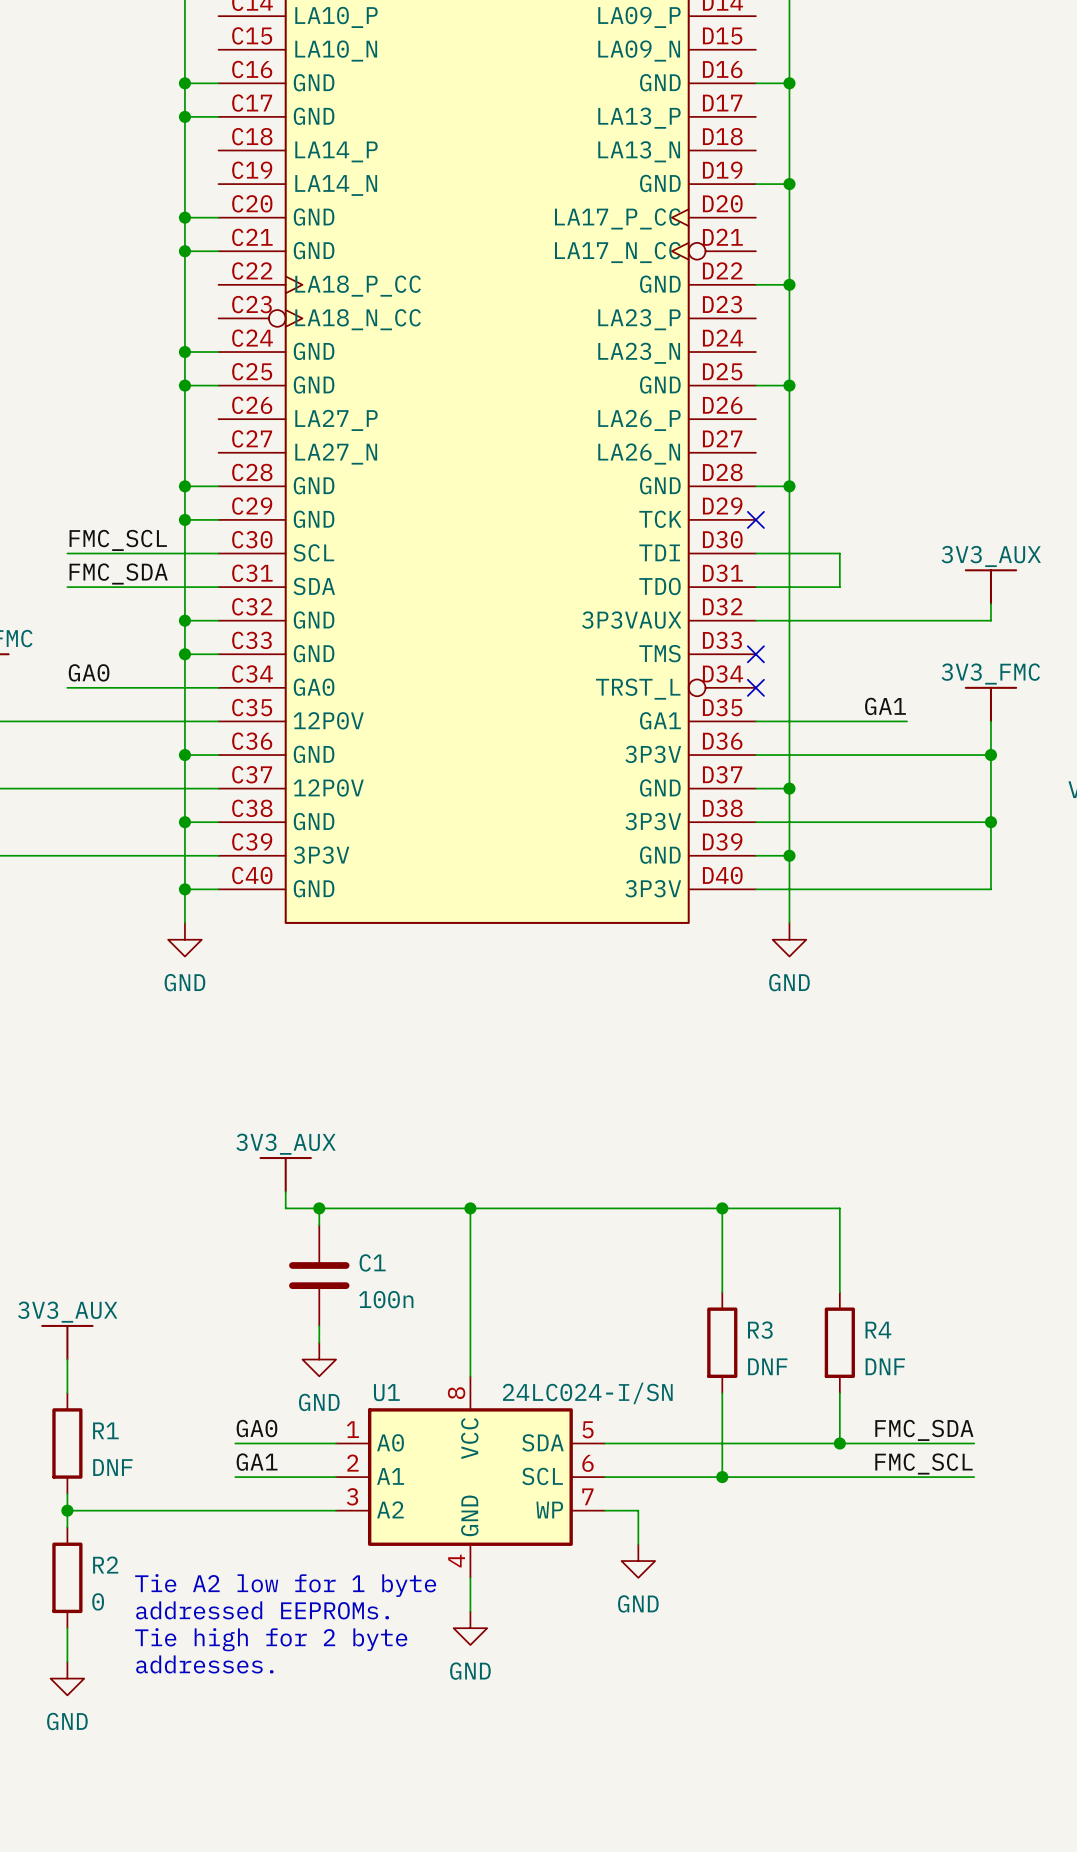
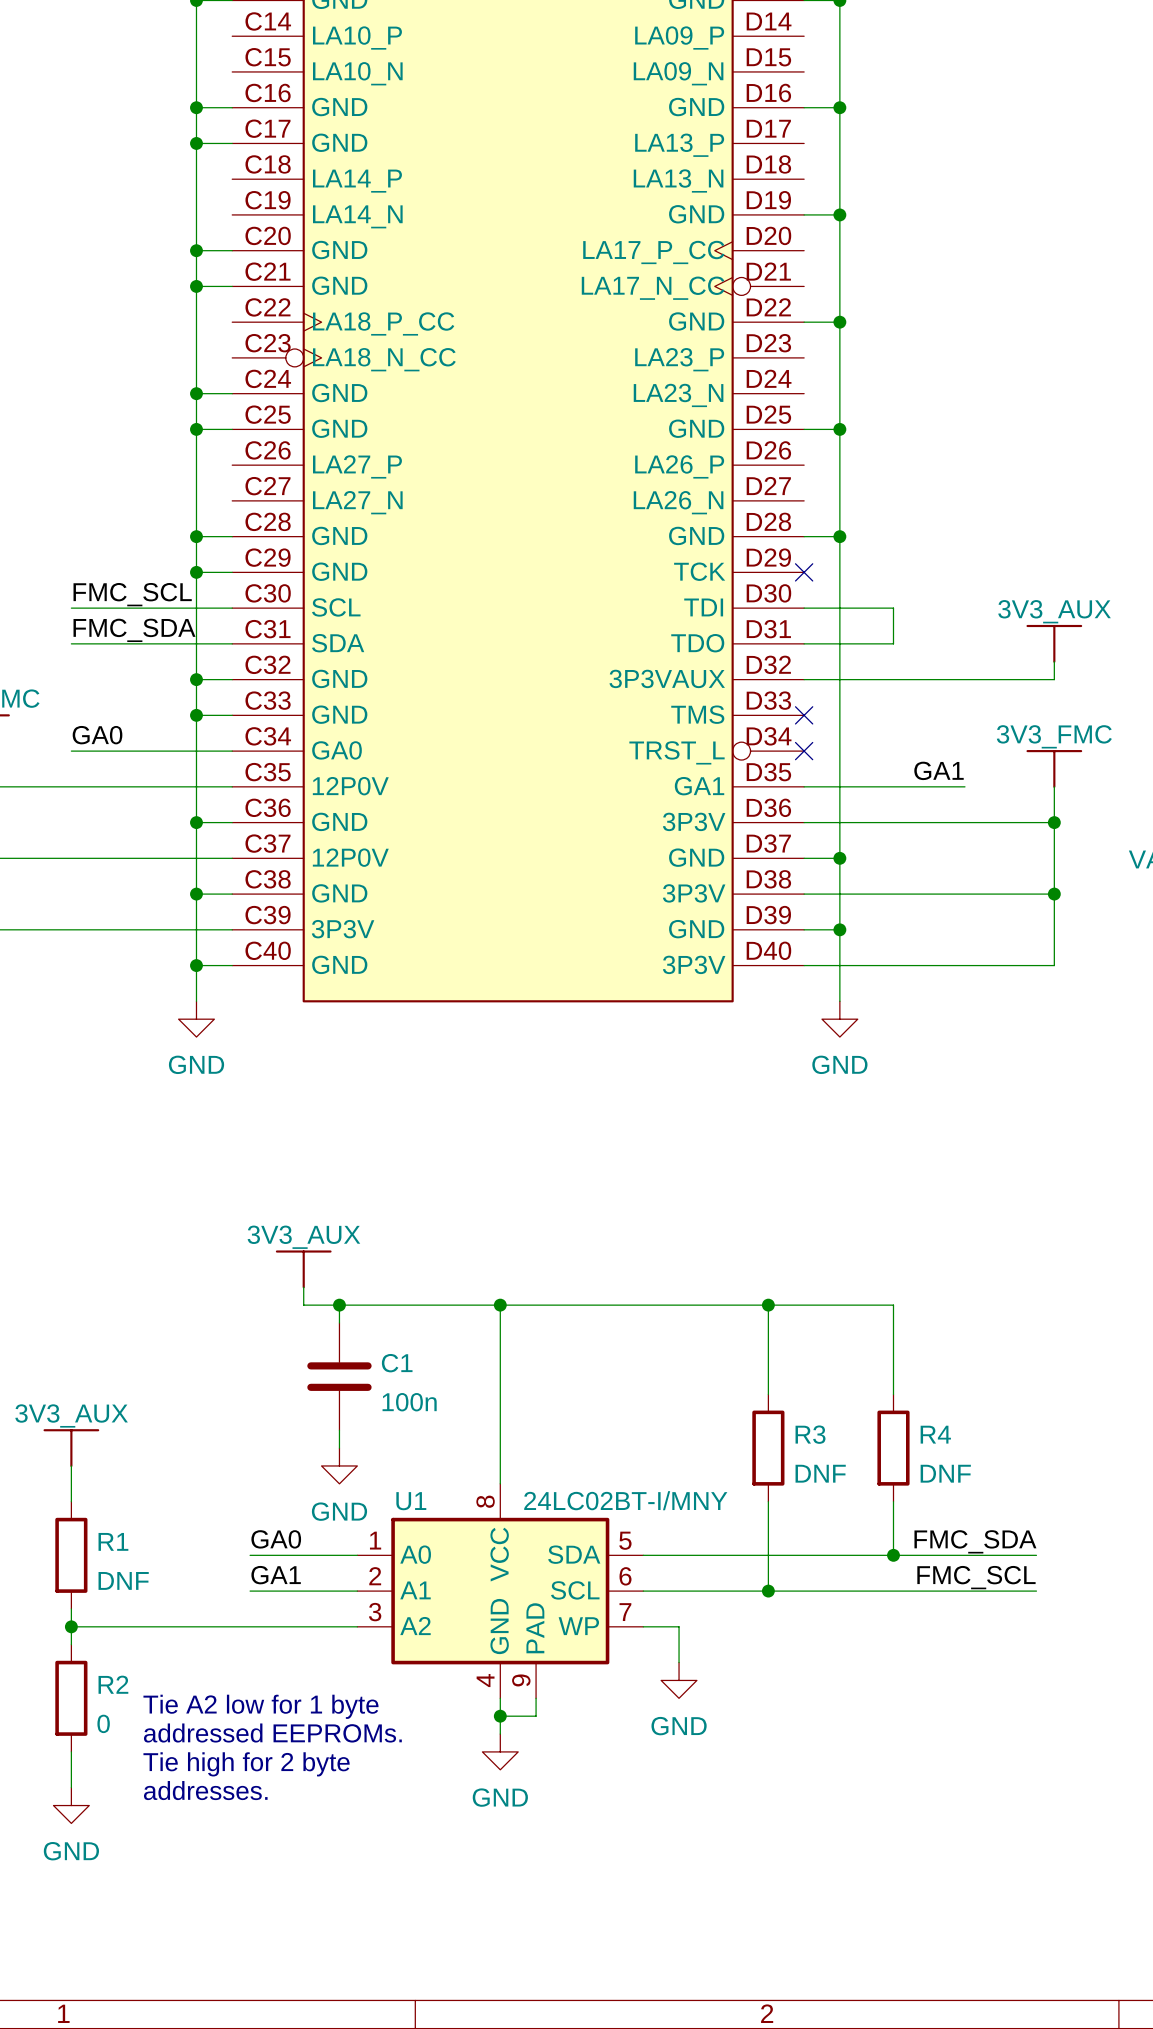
U1 symbol: [336, 1376, 605, 1578] -> [357, 1483, 644, 1699]
U1 value: 24LC024-I/SN (587, 1393) -> 24LC02BT-I/MNY (625, 1500)
wire: none -> (536, 1698) (536, 1716) (500, 1716)
junction: none -> (500, 1716)

